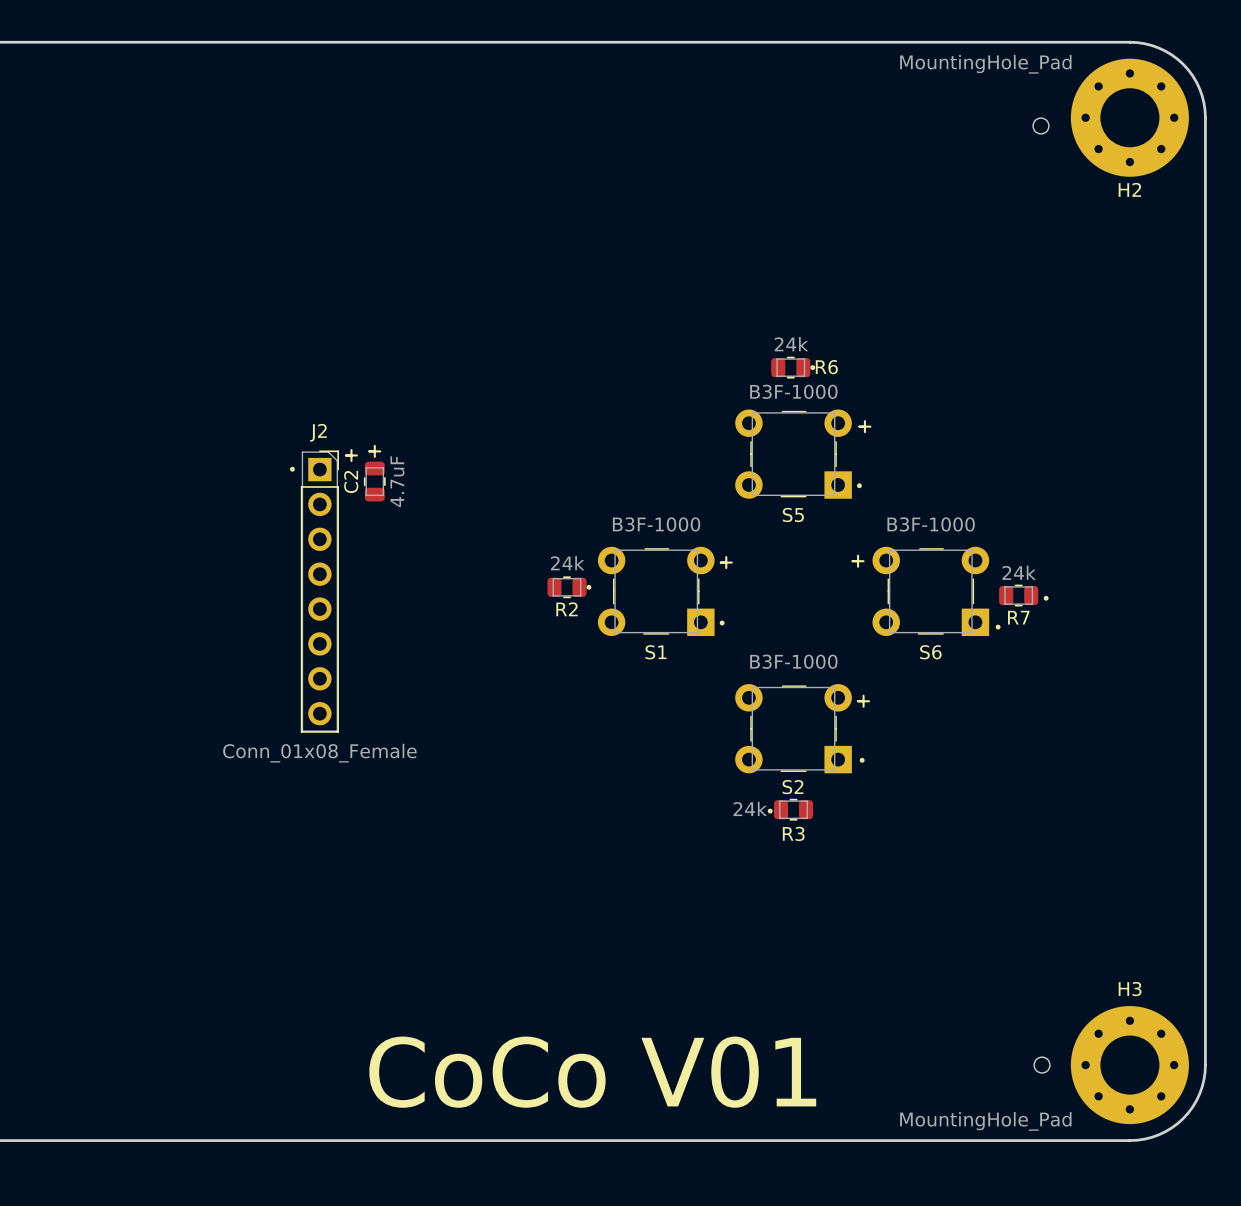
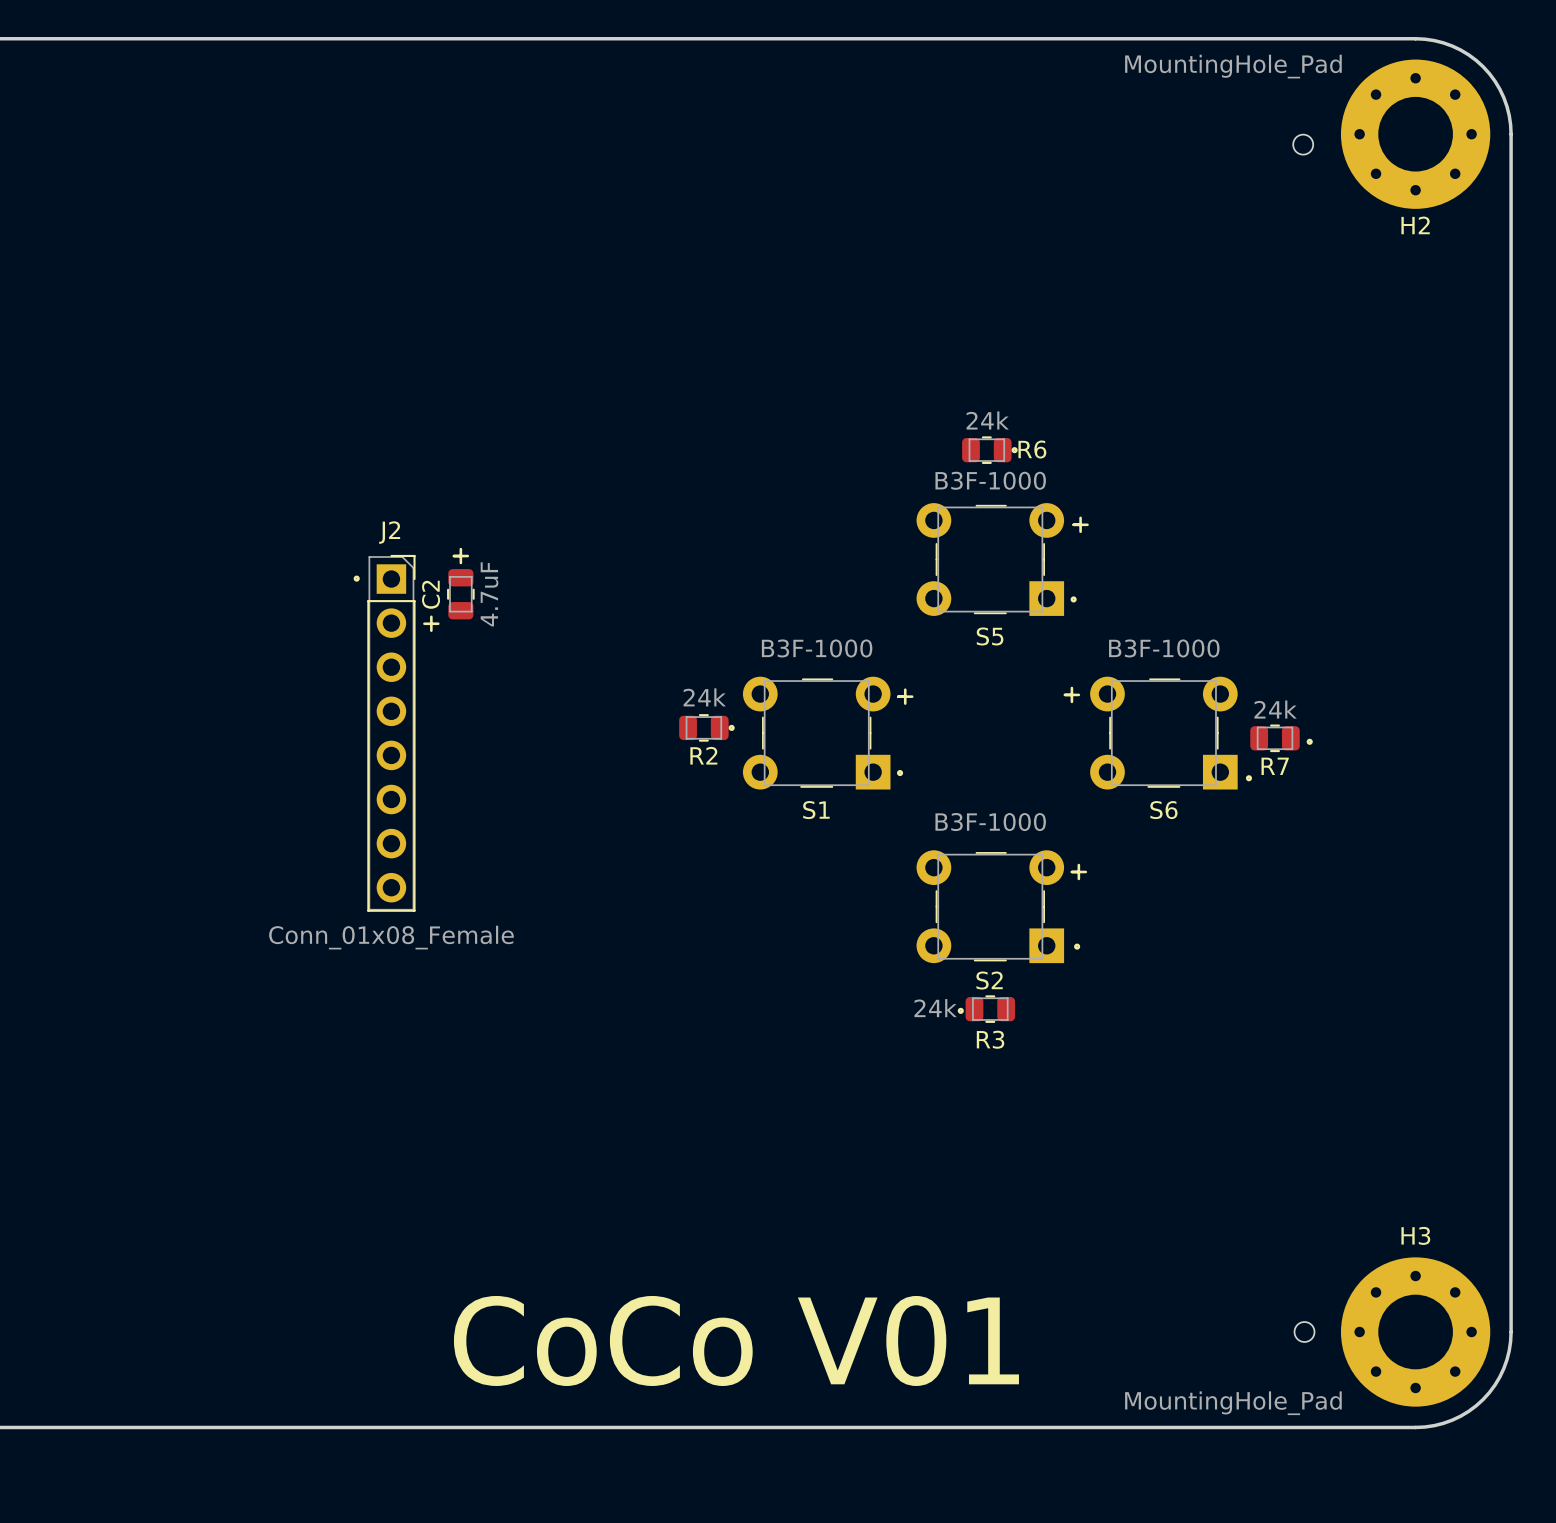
line: (351, 450) (351, 460) -> (431, 616) (431, 630)
line: (345, 455) (356, 455) -> (424, 623) (438, 623)

